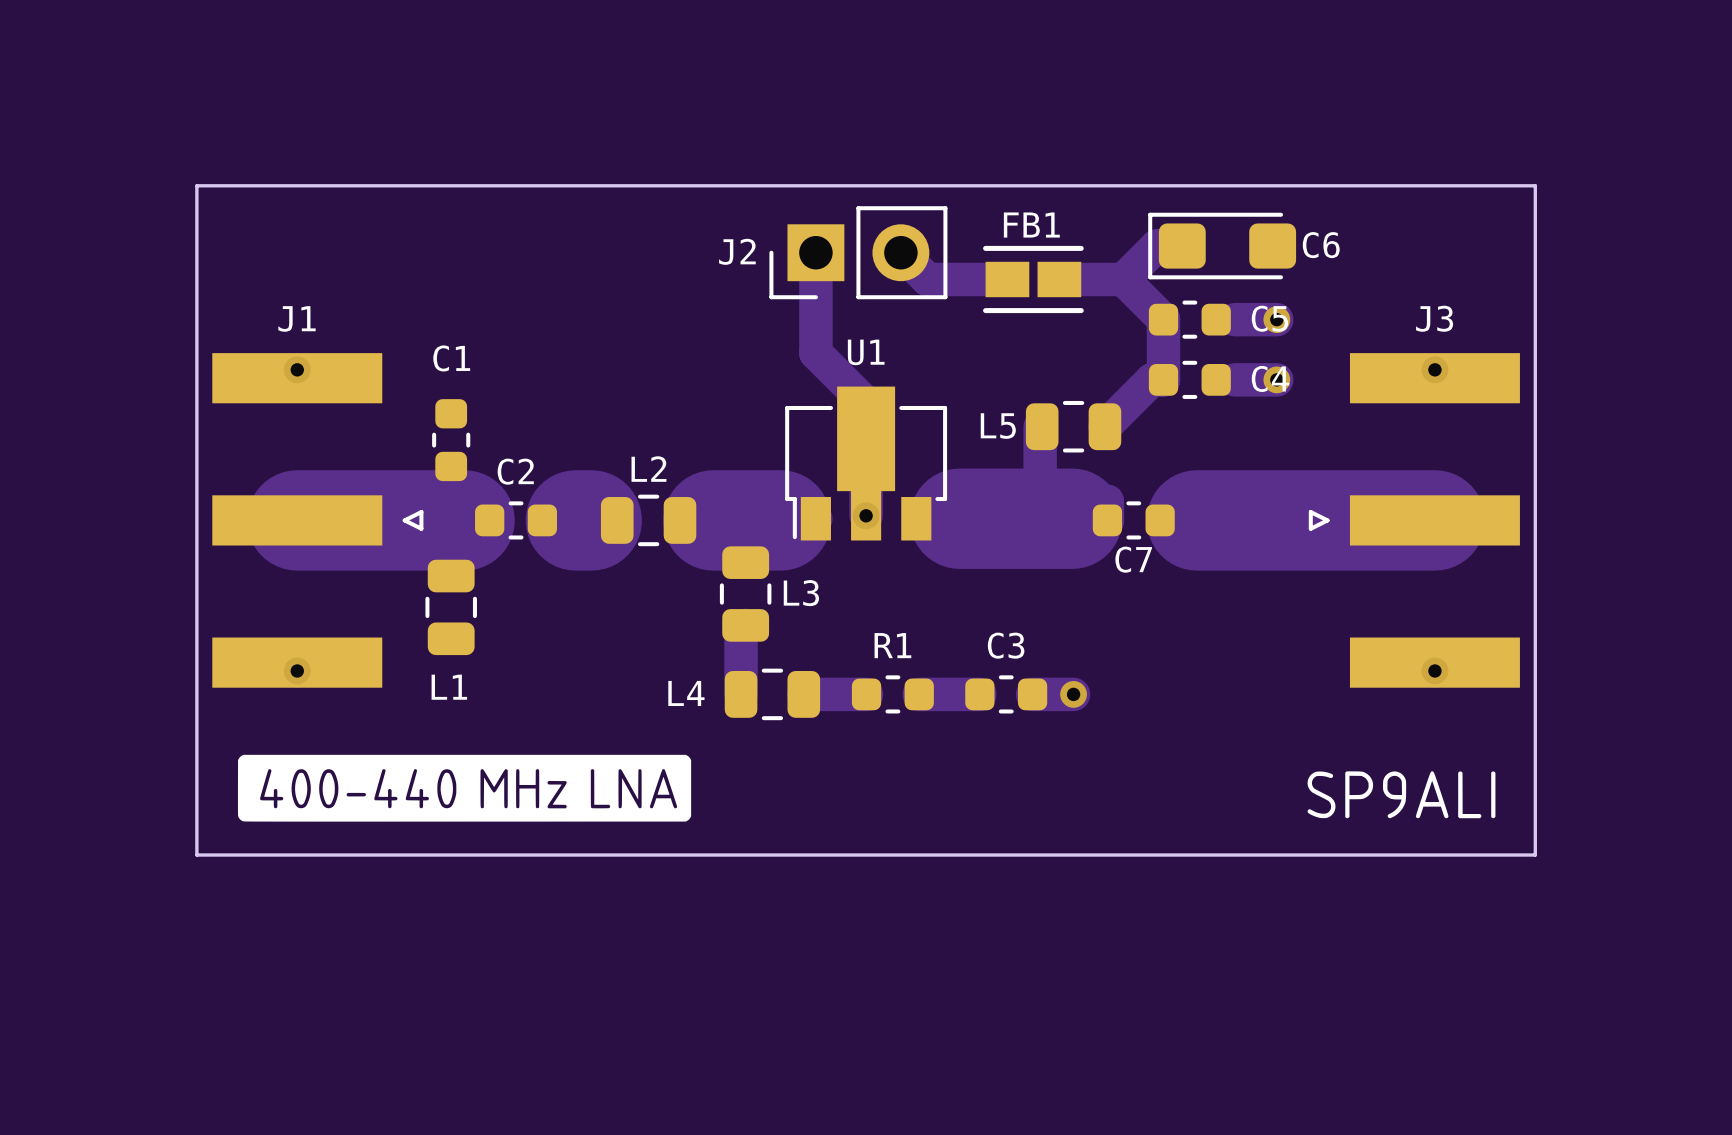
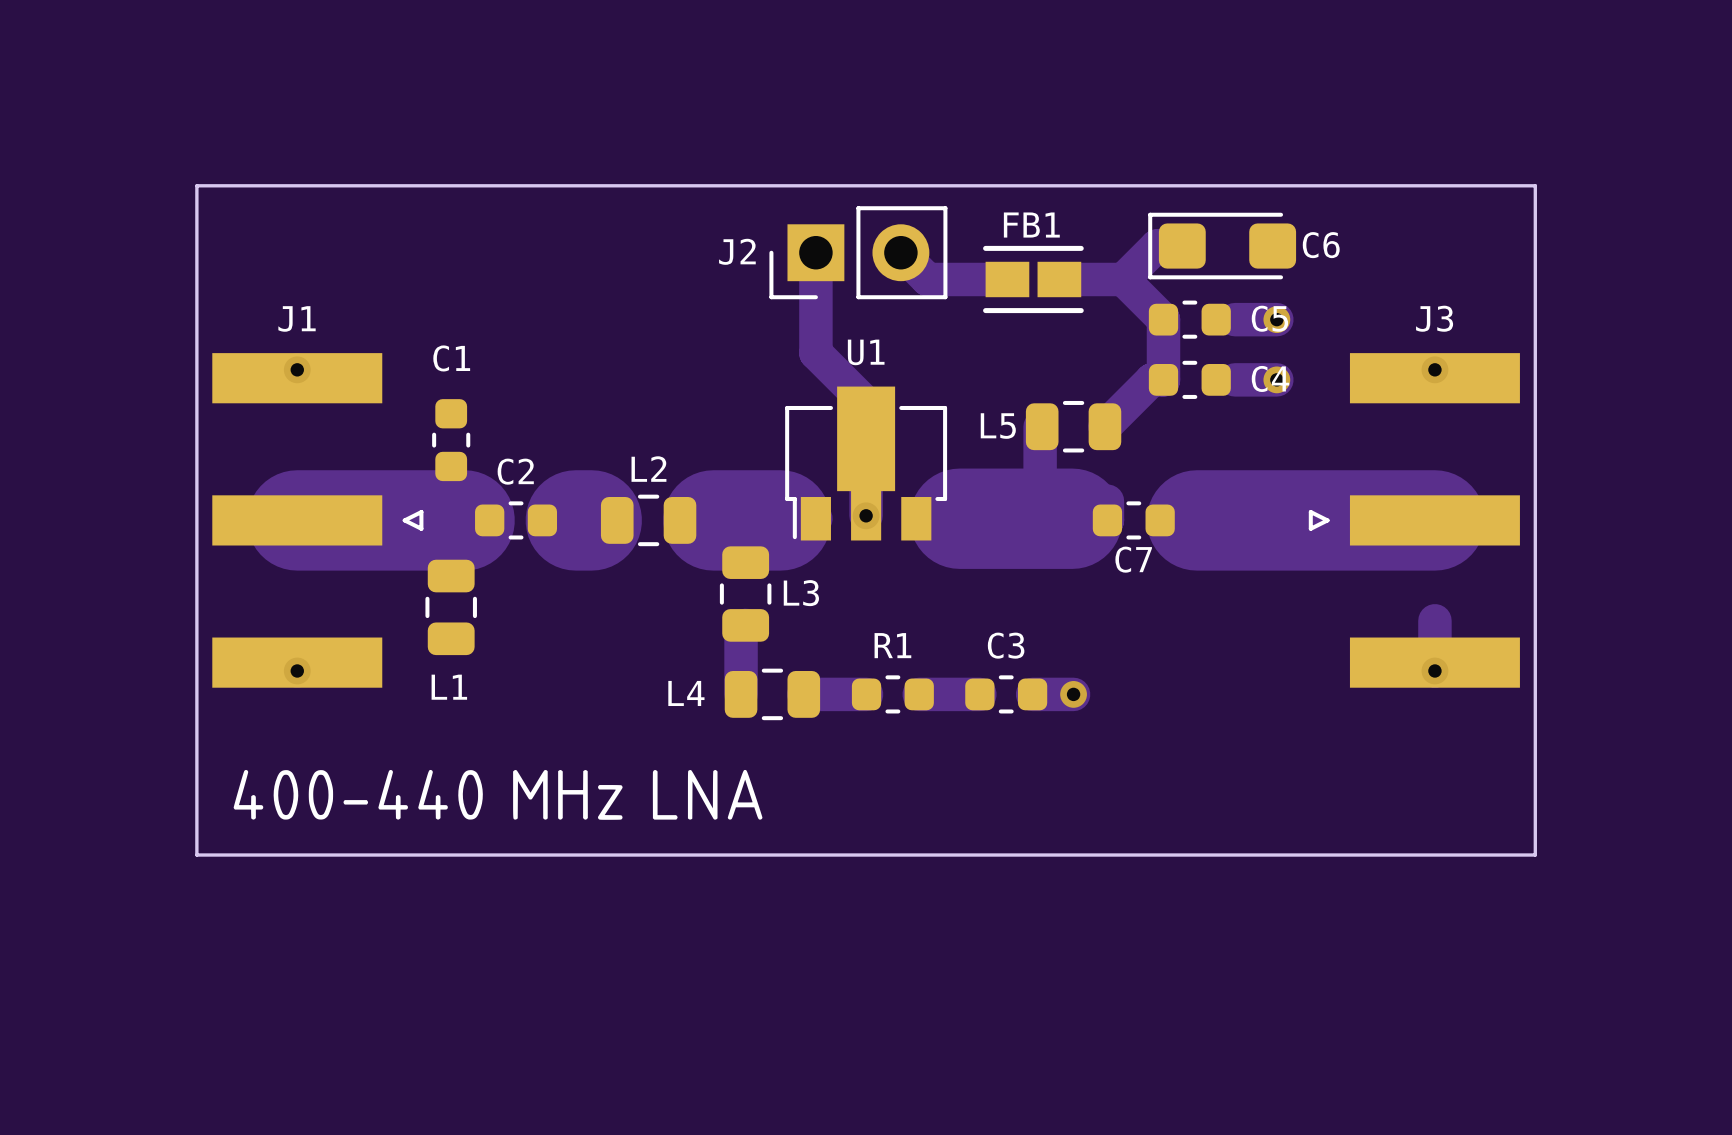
track: none -> (1434, 620) (1434, 662)
drawing: [237, 754, 692, 822] -> none
drawing: none -> [233, 769, 763, 820]
drawing: [1307, 771, 1496, 819] -> none

